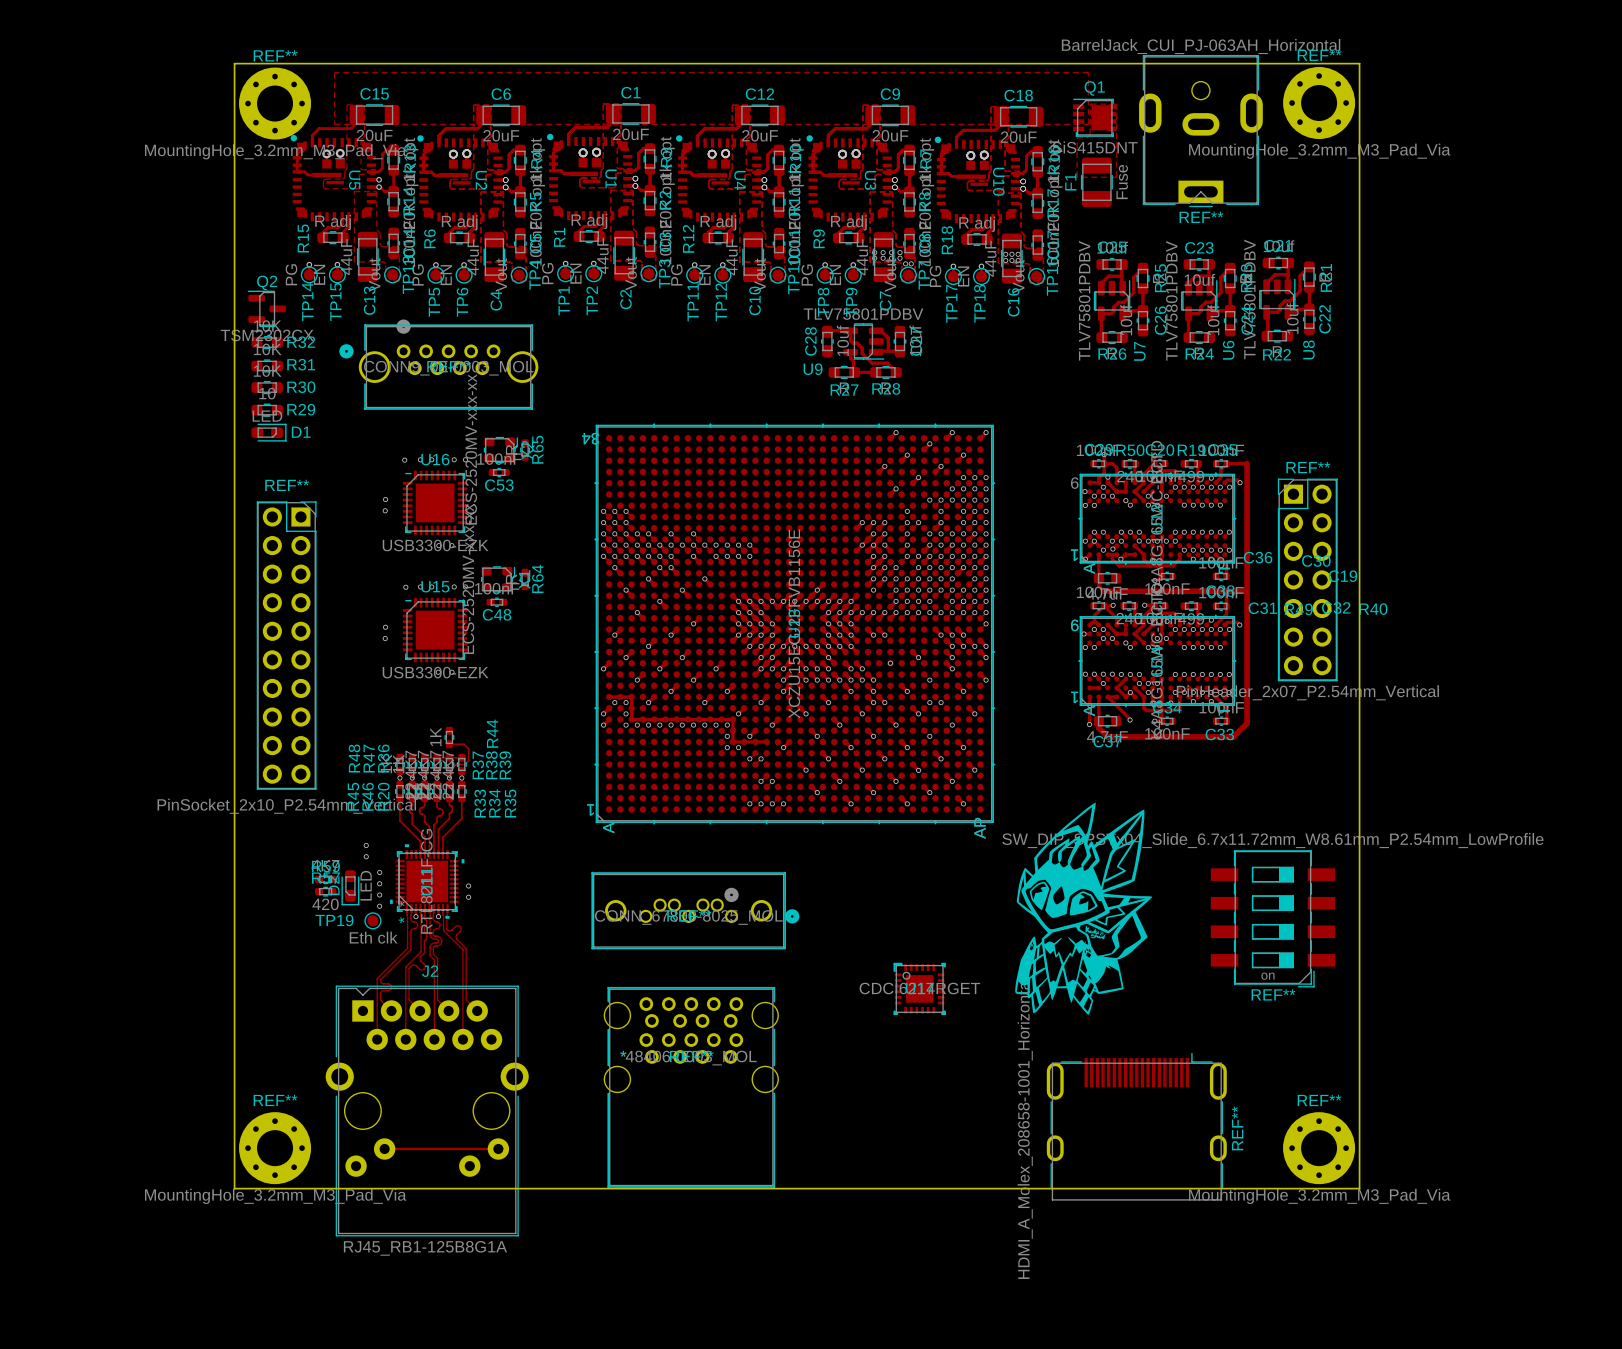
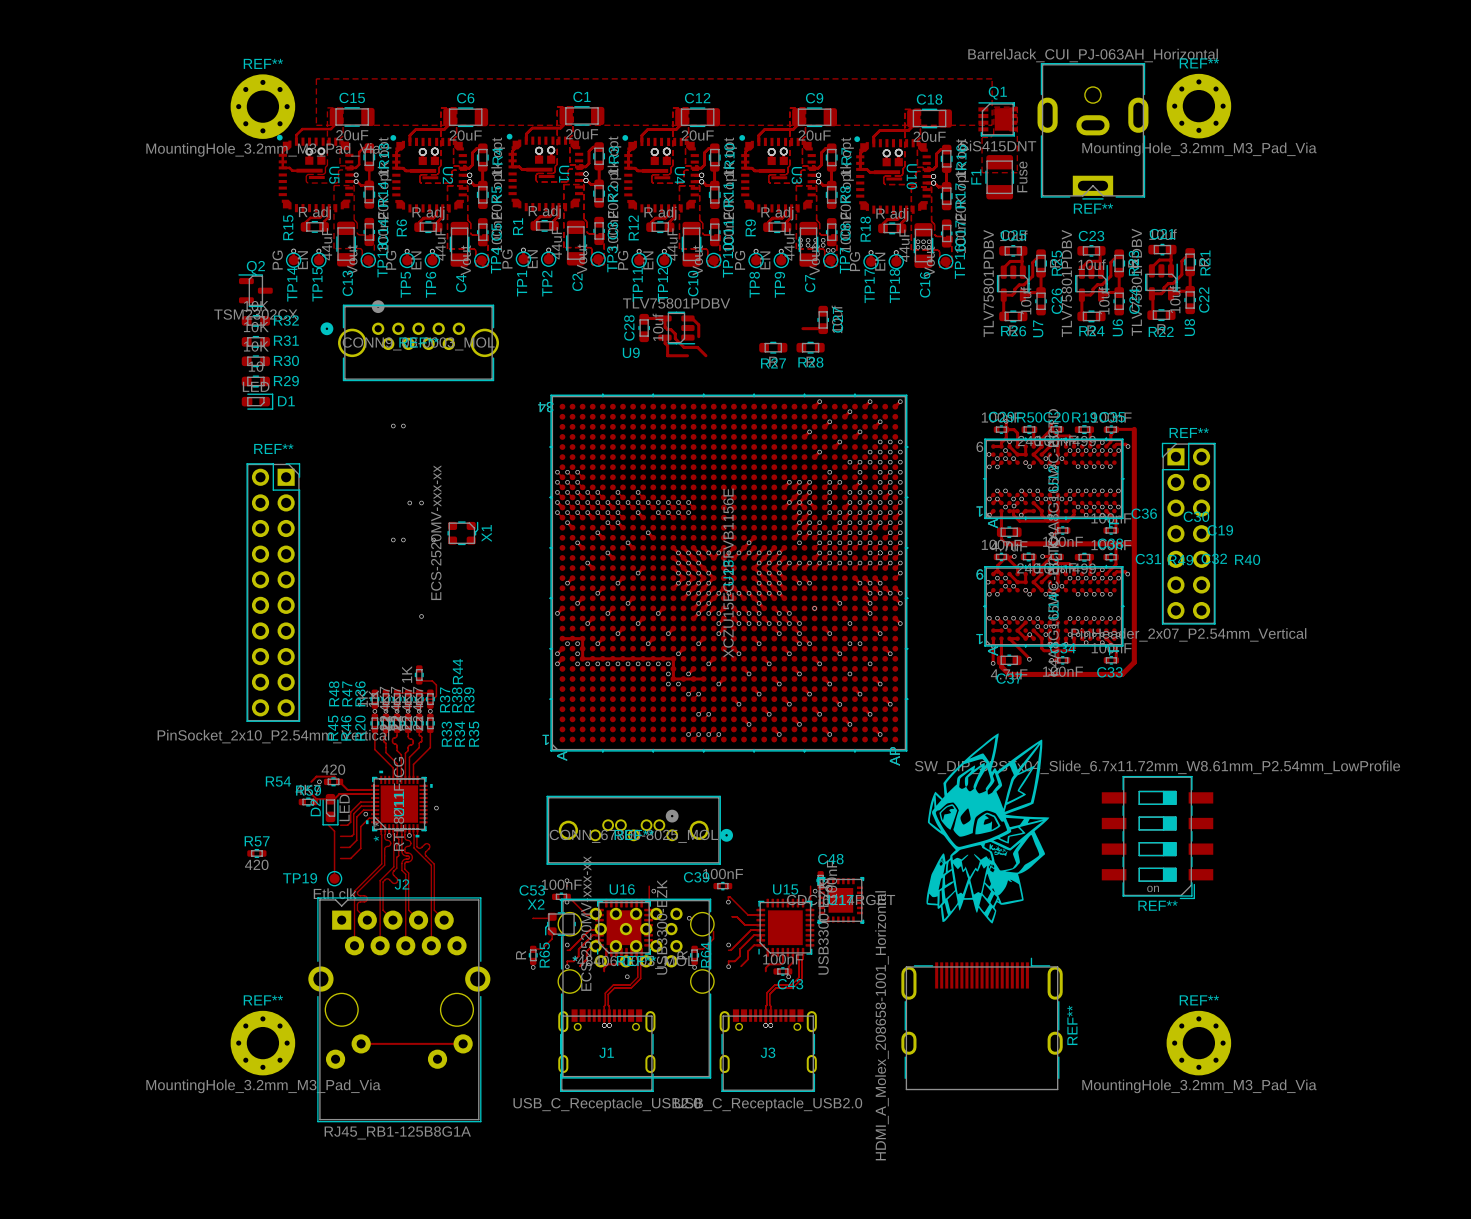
board edge: (234, 63) (1359, 63) (1359, 1188) (234, 1188) (234, 63) -> none
track: (827, 330) (850, 330) (850, 340) (862, 348) (862, 353) (871, 363) (887, 363) (896, 372) -> (644, 318) (665, 318) (665, 327) (675, 333) (675, 338) (684, 347) (697, 347) (705, 355)
track: (881, 330) (888, 338) (888, 351) -> (692, 318) (698, 324) (698, 336)
C28 position: (827, 341) -> (644, 328)
U9 position: (863, 341) -> (676, 328)
track: (850, 352) (850, 358) (853, 361) (853, 372) (875, 372) -> (665, 337) (667, 355) (687, 355)
X2 rotation: 0° (500, 450) -> 180° (560, 924)
X2 position: (500, 450) -> (560, 924)
R65 position: (525, 450) -> (533, 955)
via: (454, 459) -> none
via: (465, 459) -> none
via: (404, 460) -> none
C53 position: (499, 472) -> (561, 896)
C53 name position: C53 (499, 485) -> C53 (532, 890)
via: (385, 499) -> none
U16 rotation: 0° (435, 502) -> 90° counterclockwise (624, 927)
U16 position: (435, 502) -> (624, 927)
via: (385, 510) -> none
R64 position: (525, 579) -> (694, 955)
via: (454, 586) -> none
via: (405, 587) -> none
C48 rotation: 0° (496, 602) -> 90° clockwise (820, 880)
C48 position: (496, 602) -> (820, 880)
C48 name position: C48 (497, 614) -> C48 (830, 859)
via: (385, 627) -> none
U15 rotation: 0° (435, 630) -> 90° counterclockwise (785, 927)
U15 position: (435, 630) -> (785, 927)
via: (385, 638) -> none
via: (438, 672) -> none
via: (366, 845) -> none
track: none -> (311, 781) (316, 776) (334, 776) (347, 789) (375, 789)
via: none -> (319, 781)
R54: none -> 420 (333, 781)
via: (366, 856) -> none
track: none -> (311, 793) (316, 799) (334, 799) (339, 793) (375, 793)
via: (379, 872) -> none
track: none -> (375, 802) (360, 802) (350, 812) (350, 822) (347, 825) (340, 825)
via: (379, 883) -> none
track: none -> (375, 806) (361, 806) (353, 813) (353, 834) (351, 836) (340, 836)
track: none -> (375, 810) (363, 810) (356, 817) (356, 840) (349, 847) (340, 847)
R57 position: (325, 891) -> (256, 853)
via: none -> (365, 814)
via: (379, 894) -> none
track: none -> (375, 818) (369, 818) (360, 826) (360, 848) (350, 858) (340, 858)
via: (468, 897) -> none
track: none -> (328, 825) (334, 831) (334, 878)
via: (379, 906) -> none
TP19 position: (372, 920) -> (334, 878)
via: none -> (567, 880)
track: none -> (567, 885) (567, 886)
track: none -> (649, 886) (648, 910)
C39: none -> 100nF (722, 886)
track: none -> (810, 886) (809, 910)
via: none -> (653, 891)
via: none -> (815, 891)
track: none -> (567, 896) (586, 915) (599, 915)
track: none -> (728, 896) (748, 915) (760, 915)
track: none -> (728, 896) (728, 902)
via: none -> (567, 902)
via: none -> (728, 902)
track: none -> (552, 916) (533, 918)
track: none -> (732, 916) (736, 916) (745, 925) (760, 925)
via: none -> (689, 918)
track: none -> (599, 930) (589, 930) (569, 950) (567, 950)
track: none -> (760, 930) (750, 930) (730, 950) (728, 950)
track: none -> (552, 931) (552, 938) (542, 949) (533, 949)
track: none -> (713, 931) (713, 938) (703, 949) (694, 949)
track: none -> (599, 940) (599, 935) (592, 935) (578, 949) (578, 956) (573, 961) (567, 961)
track: none -> (760, 940) (760, 935) (753, 935) (739, 949) (739, 956) (734, 961) (728, 961)
via: none -> (567, 944)
via: none -> (728, 944)
track: none -> (599, 945) (592, 945) (586, 951) (586, 959) (579, 966)
track: none -> (760, 945) (753, 945) (748, 951) (748, 959) (741, 966)
track: none -> (621, 952) (621, 962) (619, 964) (607, 964) (604, 967) (604, 971)
track: none -> (636, 952) (637, 977) (629, 985) (613, 985) (605, 993) (604, 1025)
track: none -> (641, 952) (640, 978) (631, 988) (614, 988) (608, 994) (609, 1025)
track: none -> (782, 952) (782, 962) (780, 964) (769, 964) (765, 967) (765, 971)
track: none -> (792, 952) (792, 962) (788, 966) (788, 976)
track: none -> (797, 952) (799, 977) (791, 985) (774, 985) (766, 993) (765, 1025)
track: none -> (803, 952) (801, 978) (792, 988) (775, 988) (769, 994) (770, 1025)
track: none -> (567, 961) (567, 966)
track: none -> (728, 961) (728, 966)
via: none -> (567, 966)
via: none -> (728, 966)
via: none -> (533, 967)
via: none -> (694, 967)
C43: none -> 100nF (782, 971)
via: none -> (627, 976)
via: none -> (788, 976)
REF** position: (1136, 1126) -> (982, 1023)
via: none -> (604, 1025)
via: none -> (609, 1025)
via: none -> (765, 1025)
via: none -> (770, 1025)
J1: none -> USB_C_Receptacle_USB2.0 (606, 1050)
J3: none -> USB_C_Receptacle_USB2.0 (768, 1050)

